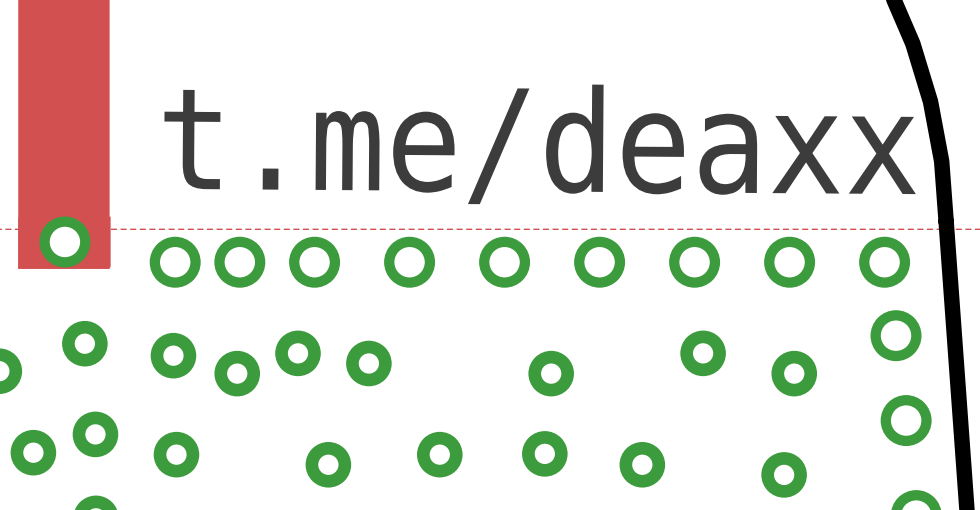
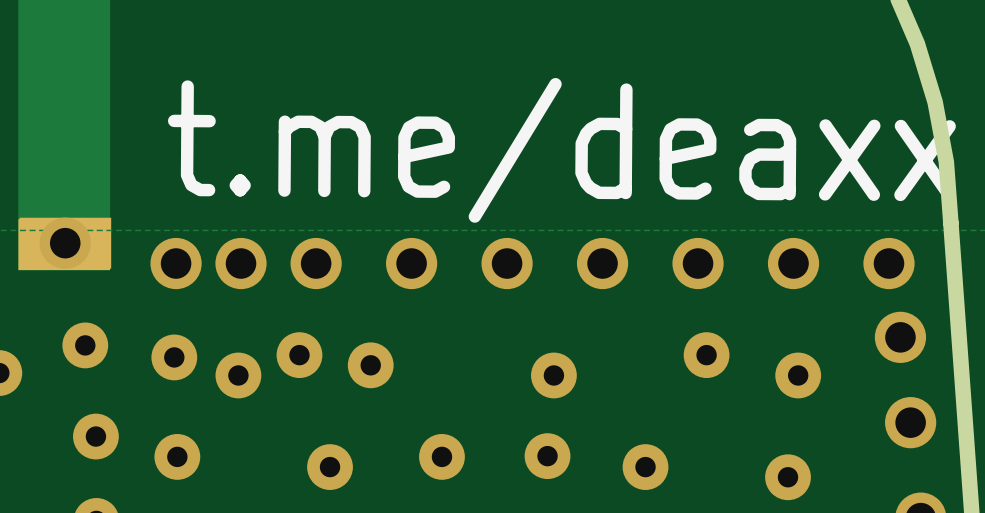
via: (33, 452) -> none

